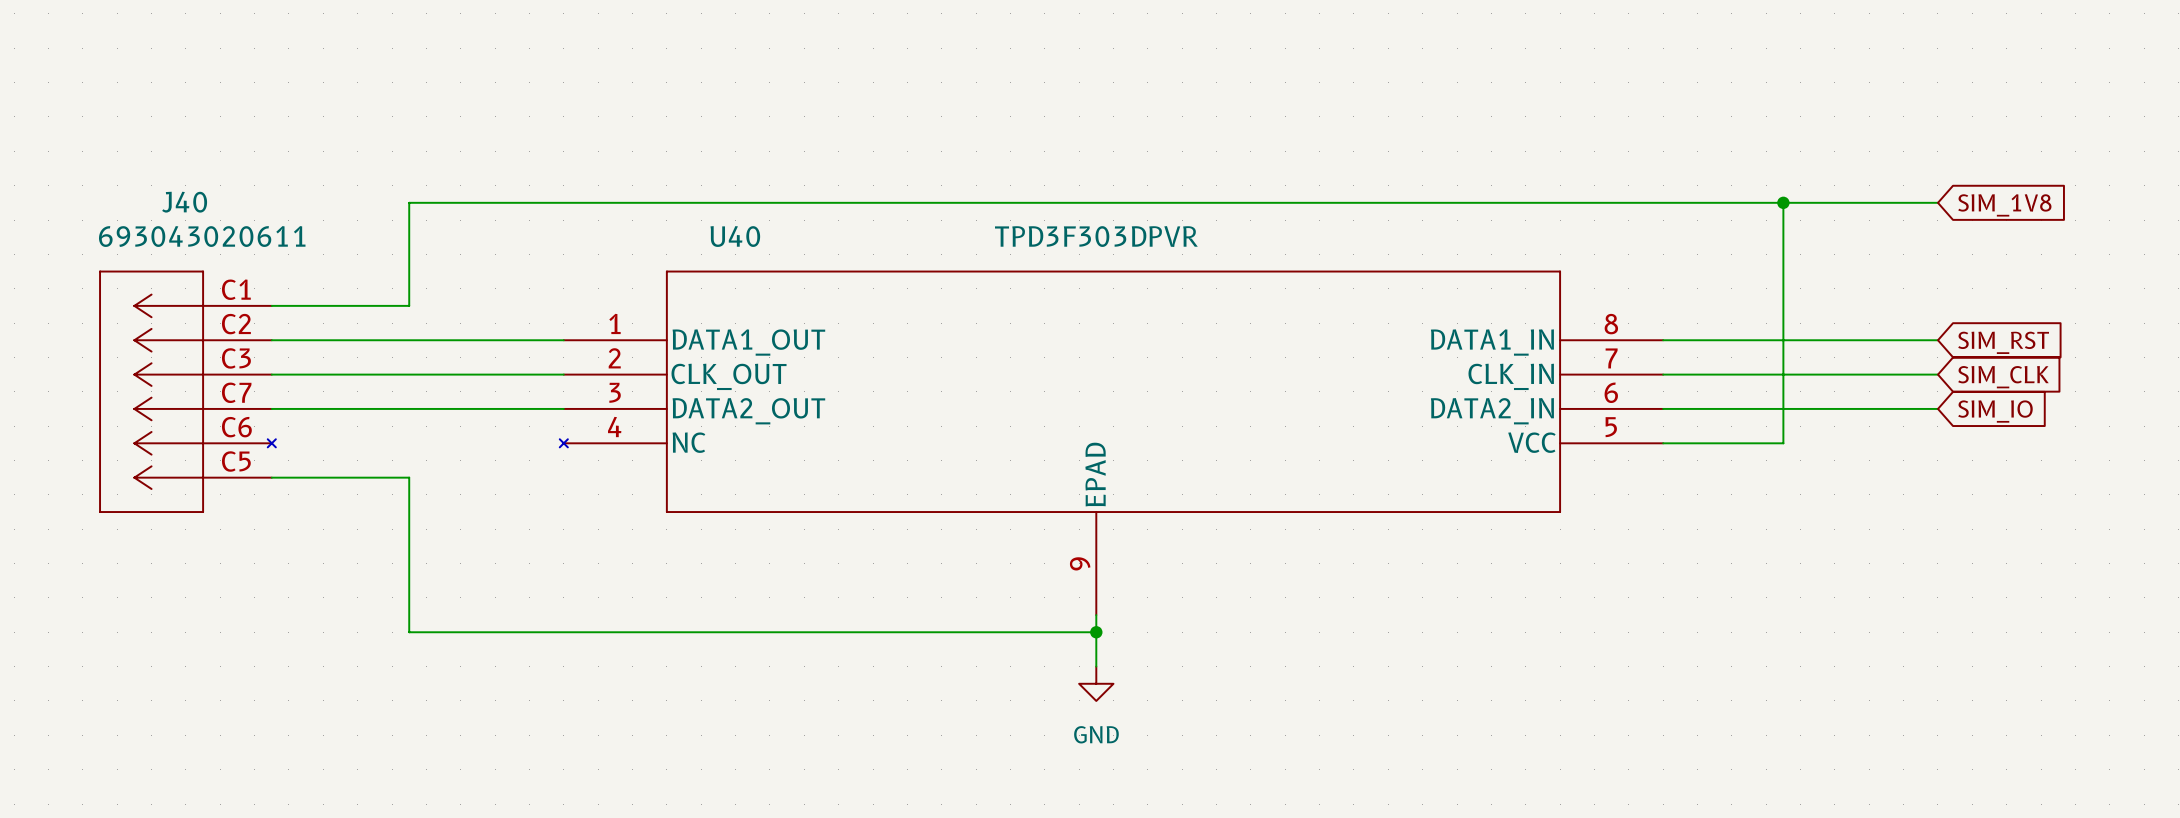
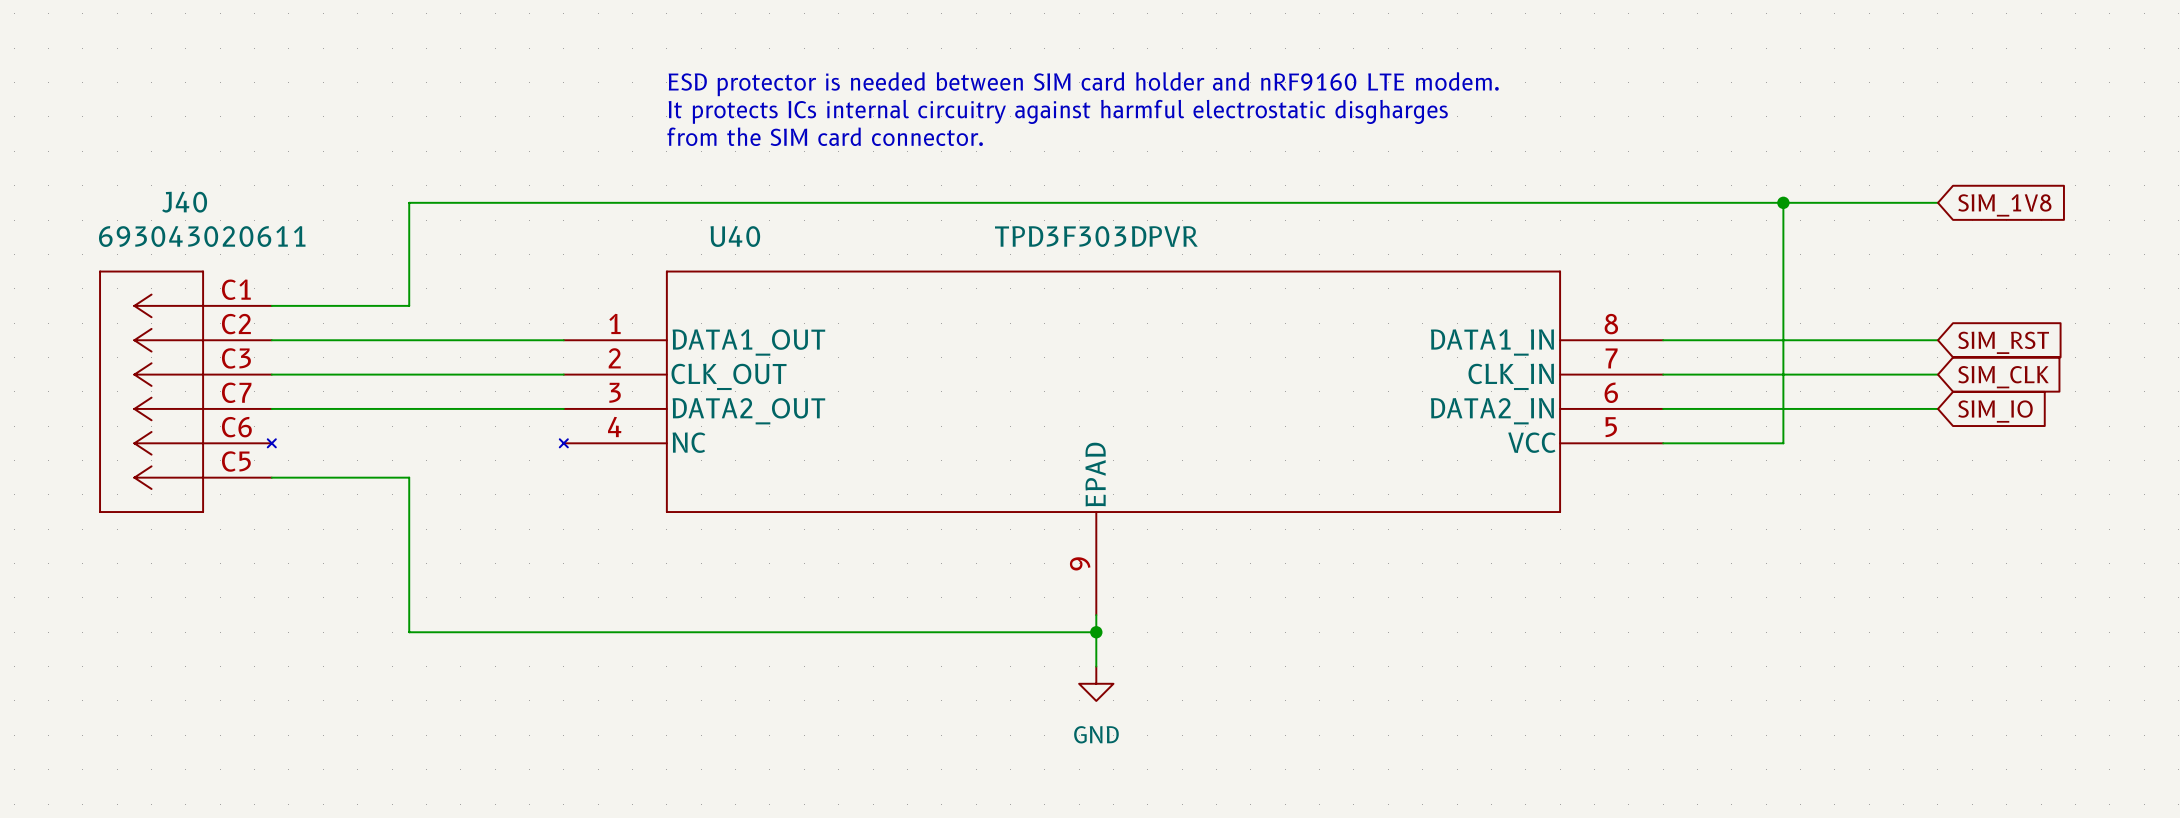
text: none -> ESD protector is needed between SIM card holder and nRF9160 LTE modem. (1083, 84)
text: none -> It protects ICs internal circuitry against harmful electrostatic disgharges (1058, 111)
text: none -> from the SIM card connector. (825, 136)

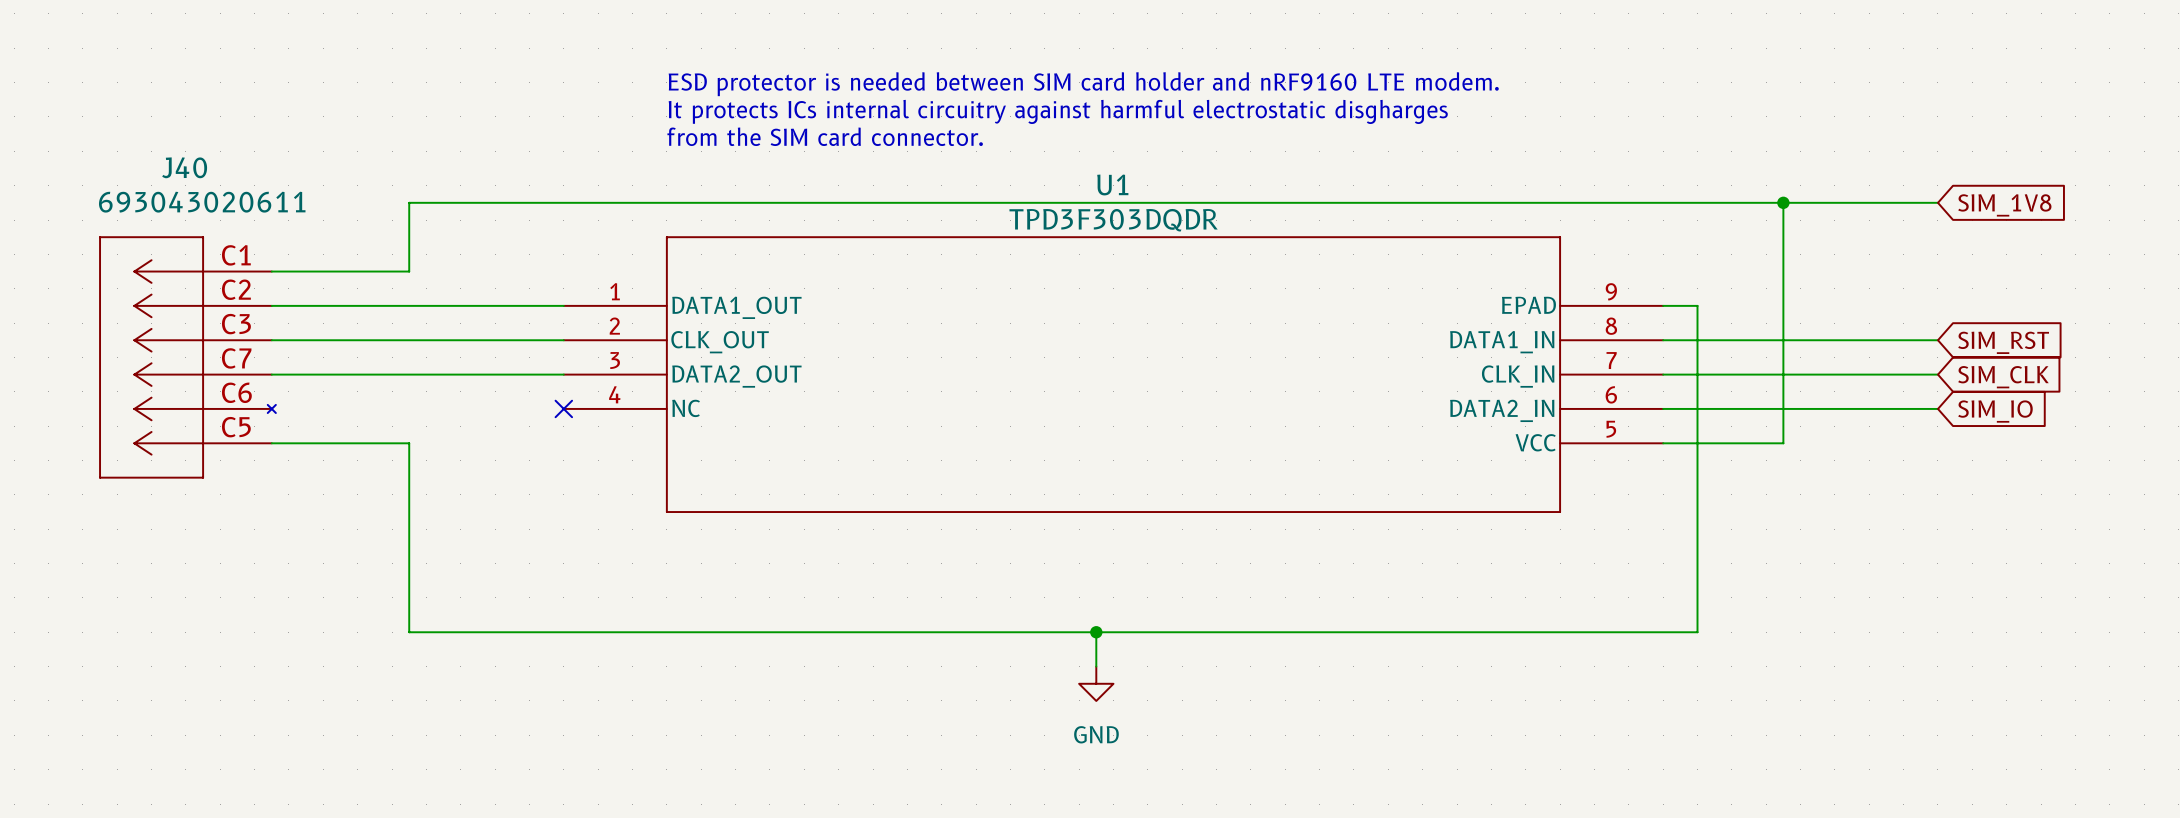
wire: (409, 271) (409, 305) -> (409, 271) (271, 271)
wire: none -> (409, 305) (563, 305)
U1: none -> TPD3F303DQDR (1113, 374)
J40 position: (187, 391) -> (187, 357)
wire: (271, 408) (563, 408) -> none
no-connect mark: none -> (563, 408)
U40: TPD3F303DPVR (1111, 442) -> none
wire: (271, 477) (409, 477) -> (271, 443) (409, 443) (409, 477)
wire: (1096, 615) (1096, 632) -> (1663, 305) (1697, 305) (1697, 632) (1096, 632)

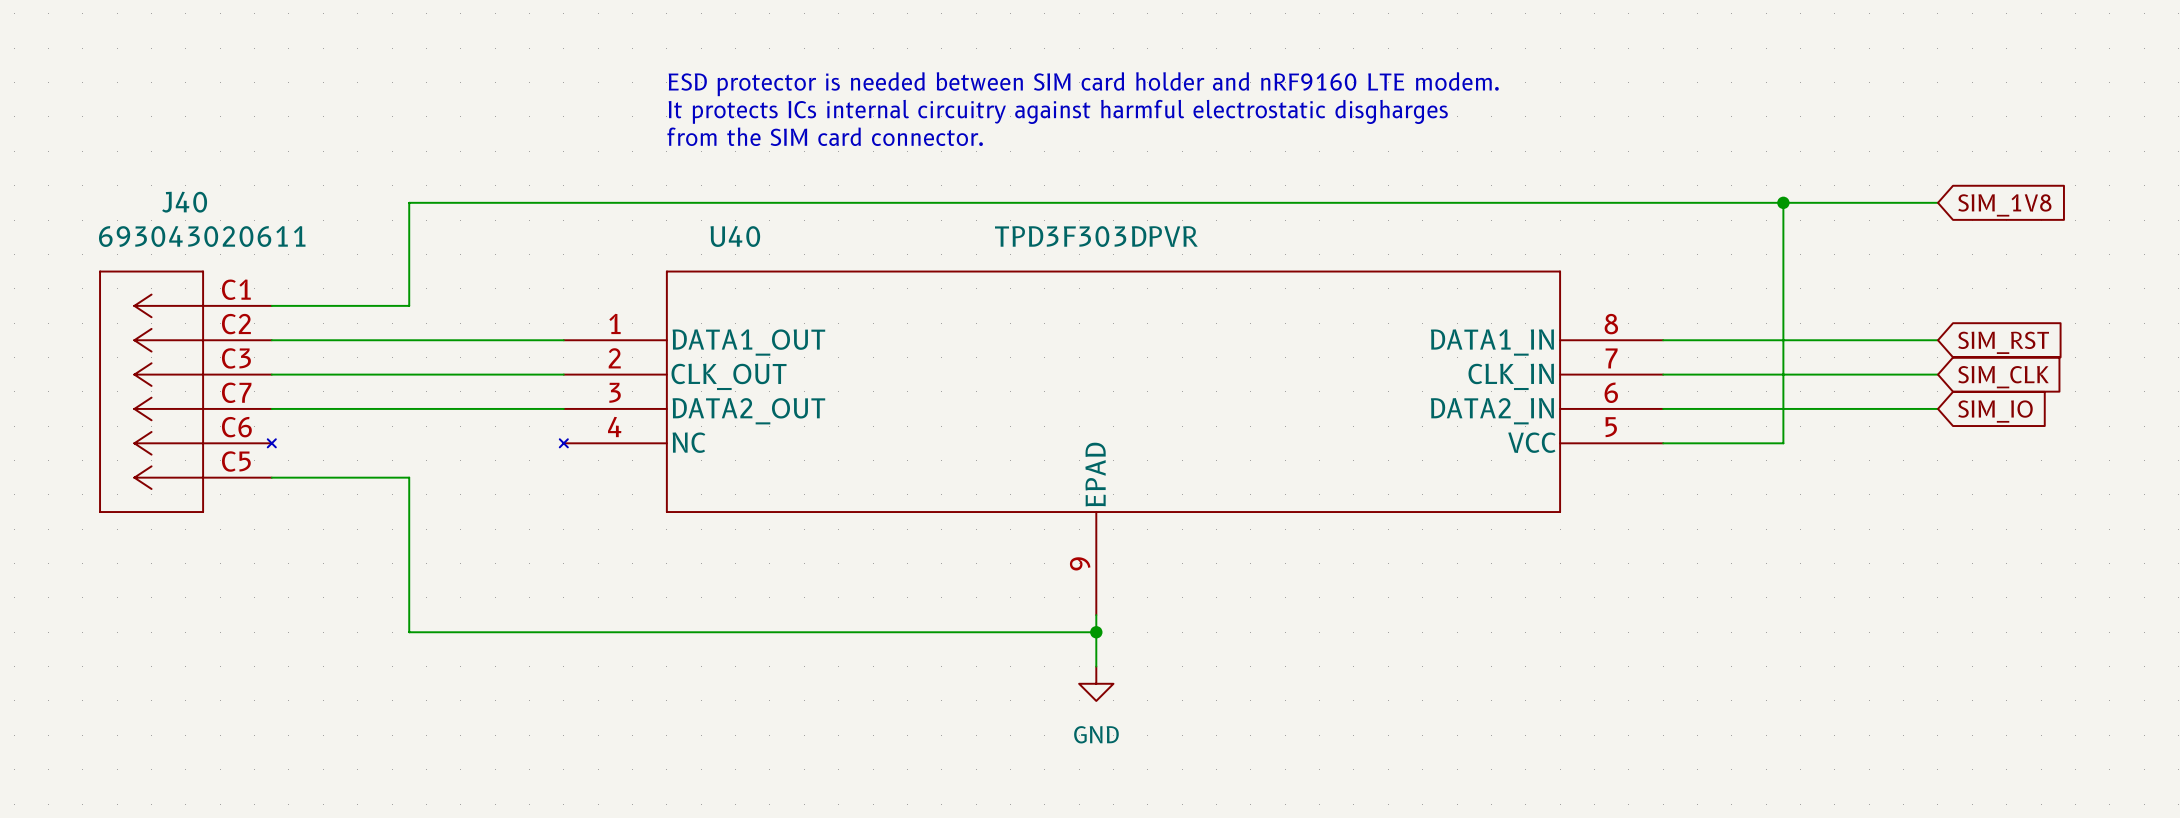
wire: (271, 271) (409, 271) -> (409, 305) (409, 271)
wire: (409, 305) (563, 305) -> none
wire: (1663, 305) (1697, 305) (1697, 632) (1096, 632) -> (1096, 615) (1096, 632)
J40 position: (187, 357) -> (187, 391)
U1: TPD3F303DQDR (1113, 374) -> none
wire: none -> (271, 408) (563, 408)
no-connect mark: (563, 408) -> none
U40: none -> TPD3F303DPVR (1111, 442)
wire: (271, 443) (409, 443) (409, 477) -> (271, 477) (409, 477)

